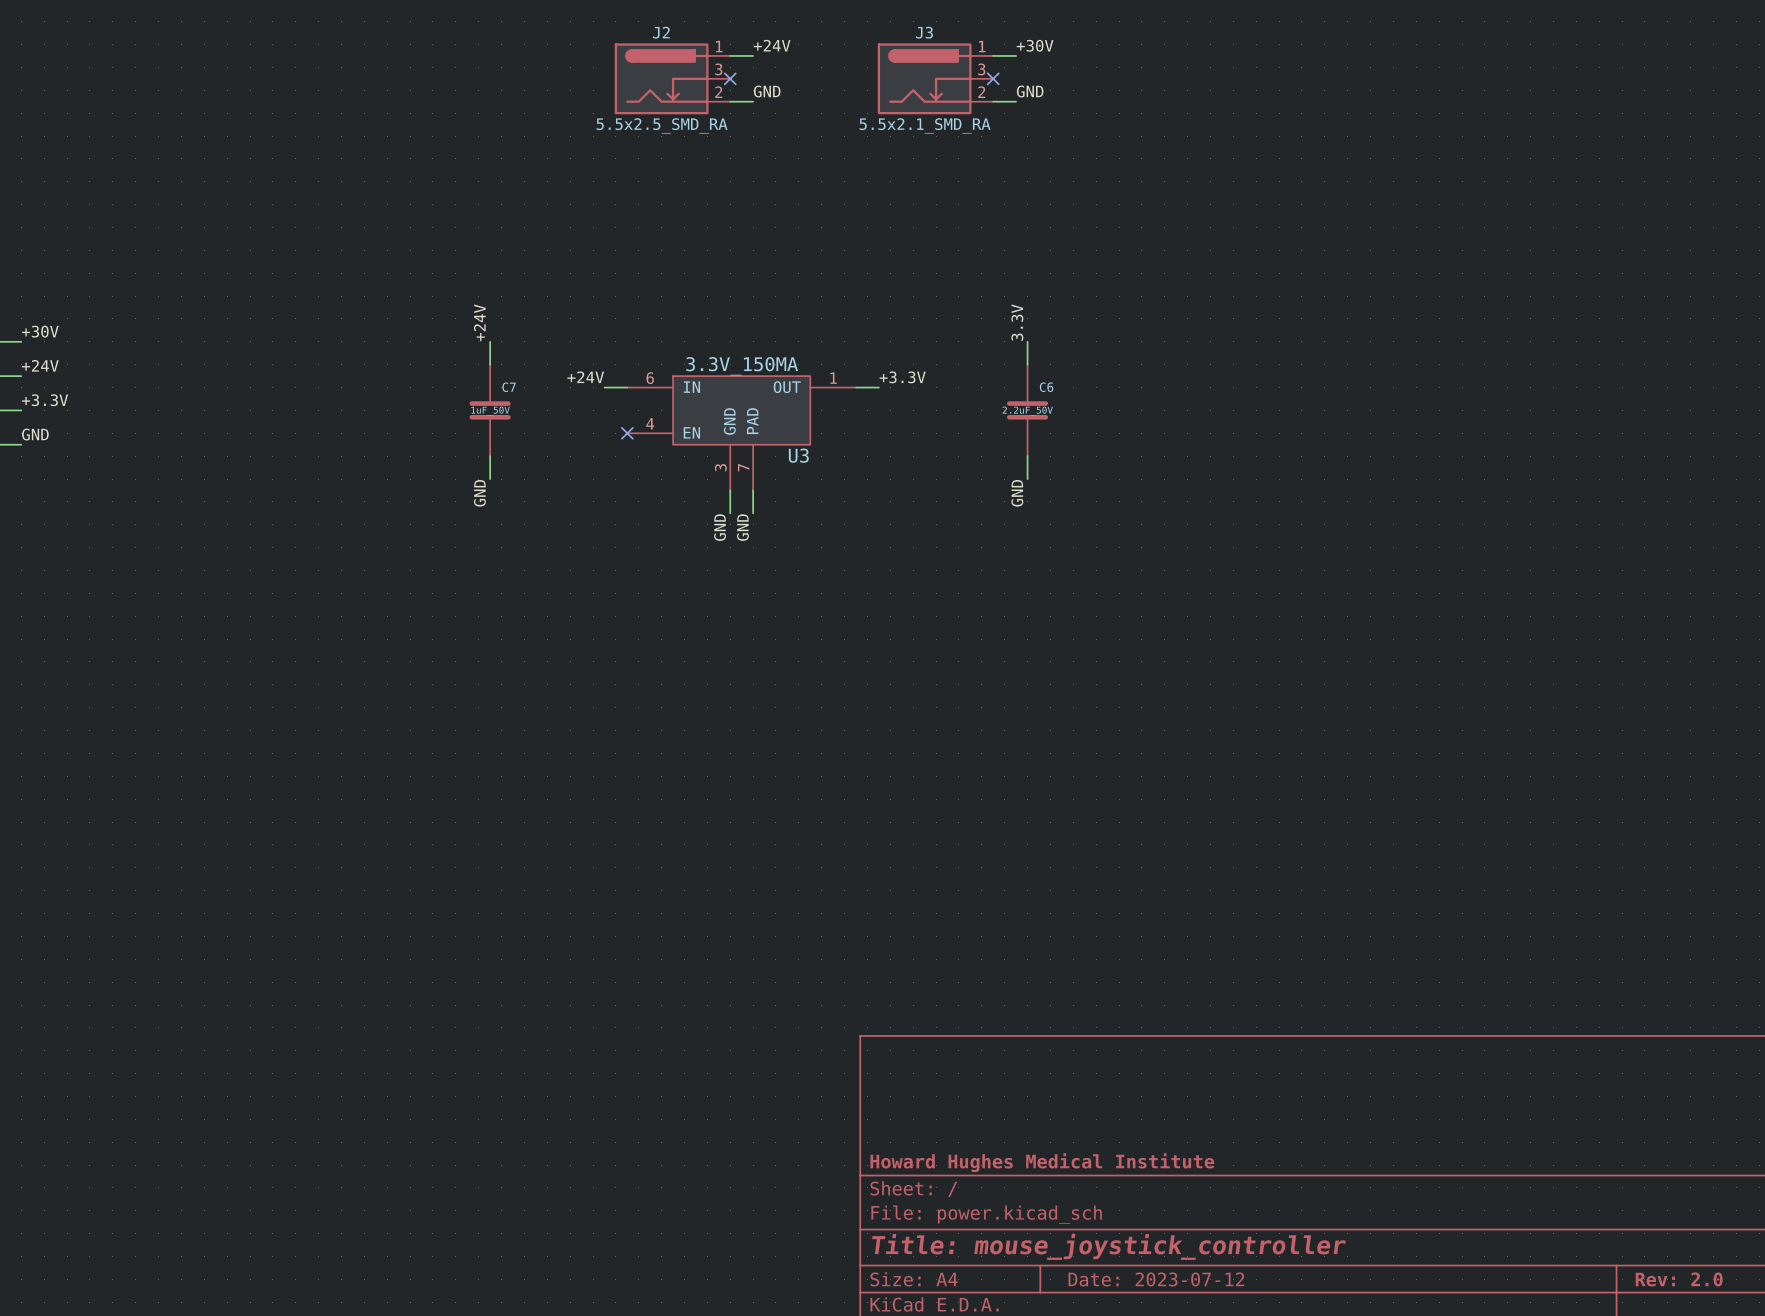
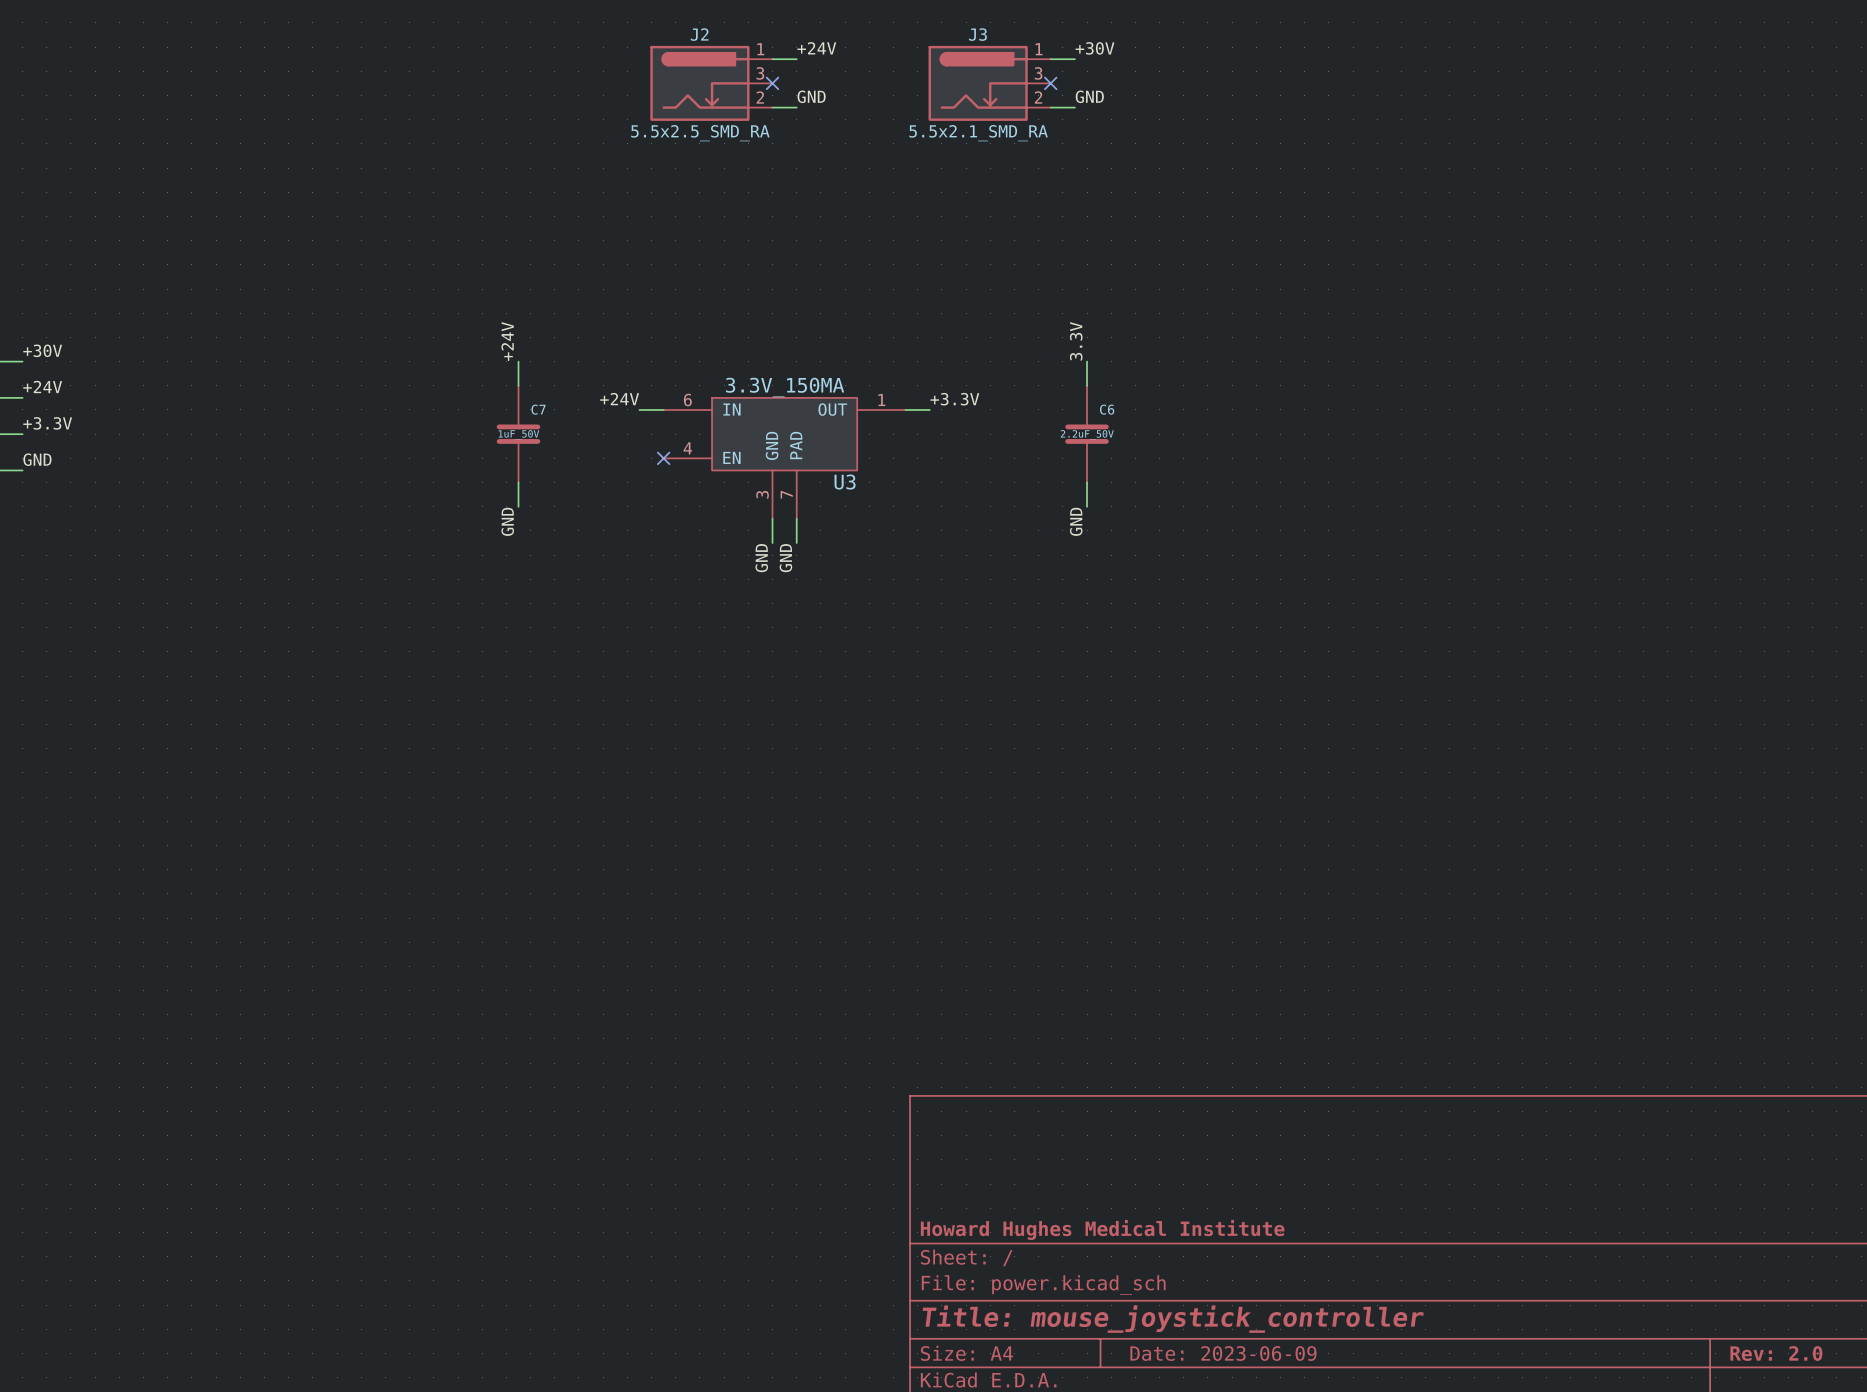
title block: Date: 2023-07-12 (1156, 1279) -> Date: 2023-06-09 (1223, 1353)

